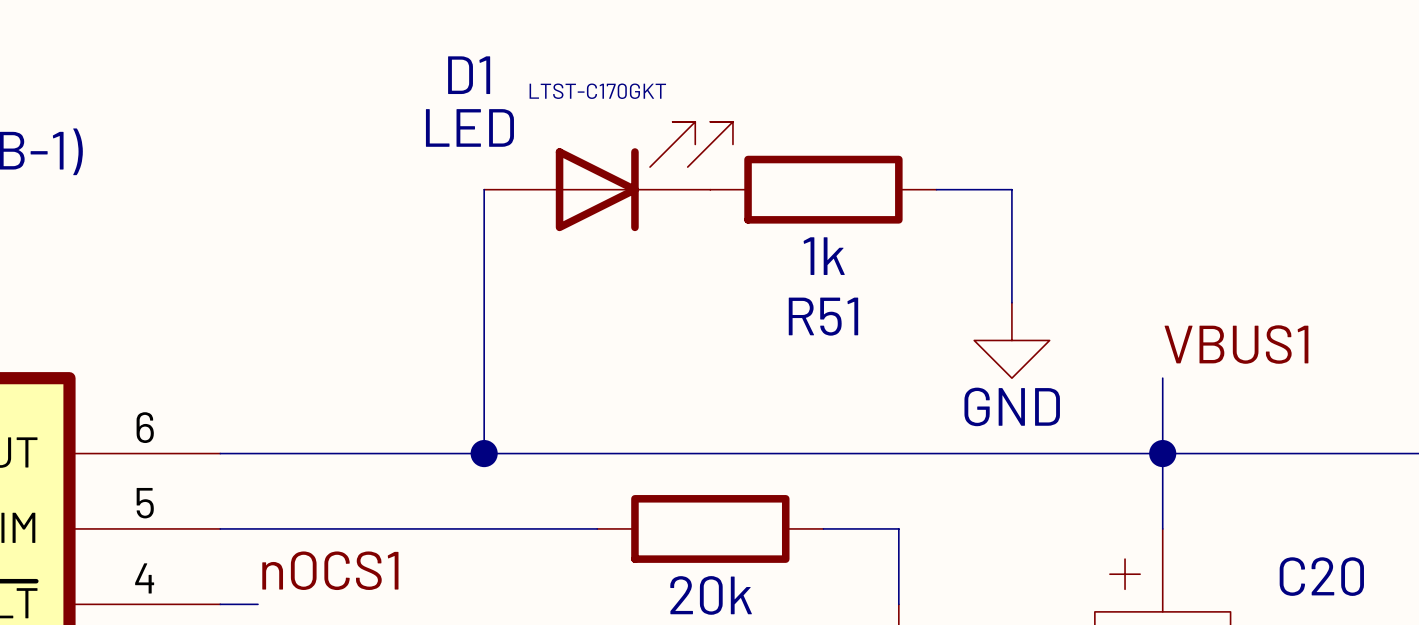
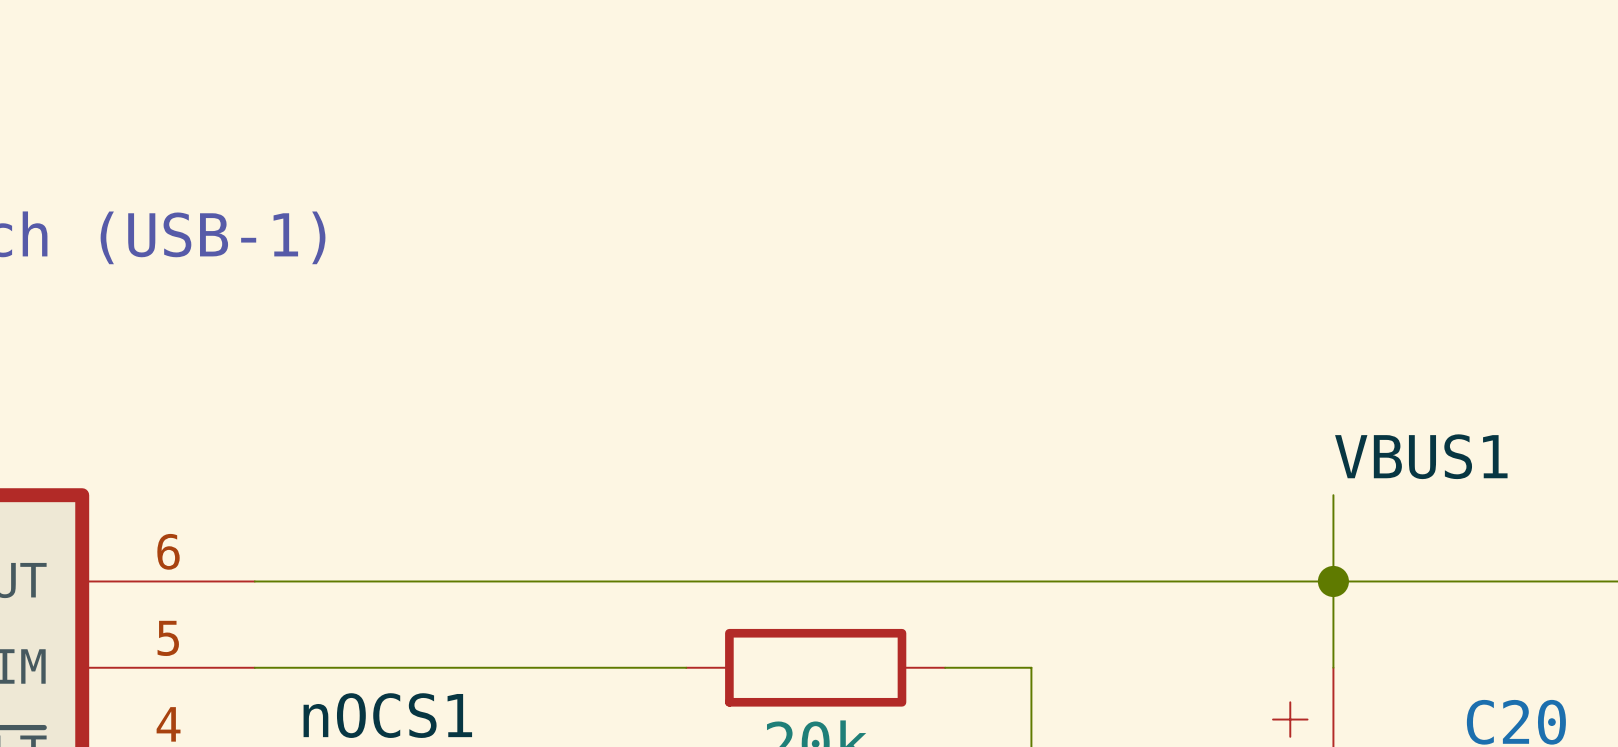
text: LTST-C170GKT (597, 91) -> none
D1: LED (608, 176) -> none
wire: (484, 189) (484, 453) -> none
R51: 1k (823, 189) -> none
wire: (936, 189) (1011, 189) (1011, 302) -> none
power symbol: GND (1011, 340) -> none
junction: (484, 453) -> none

